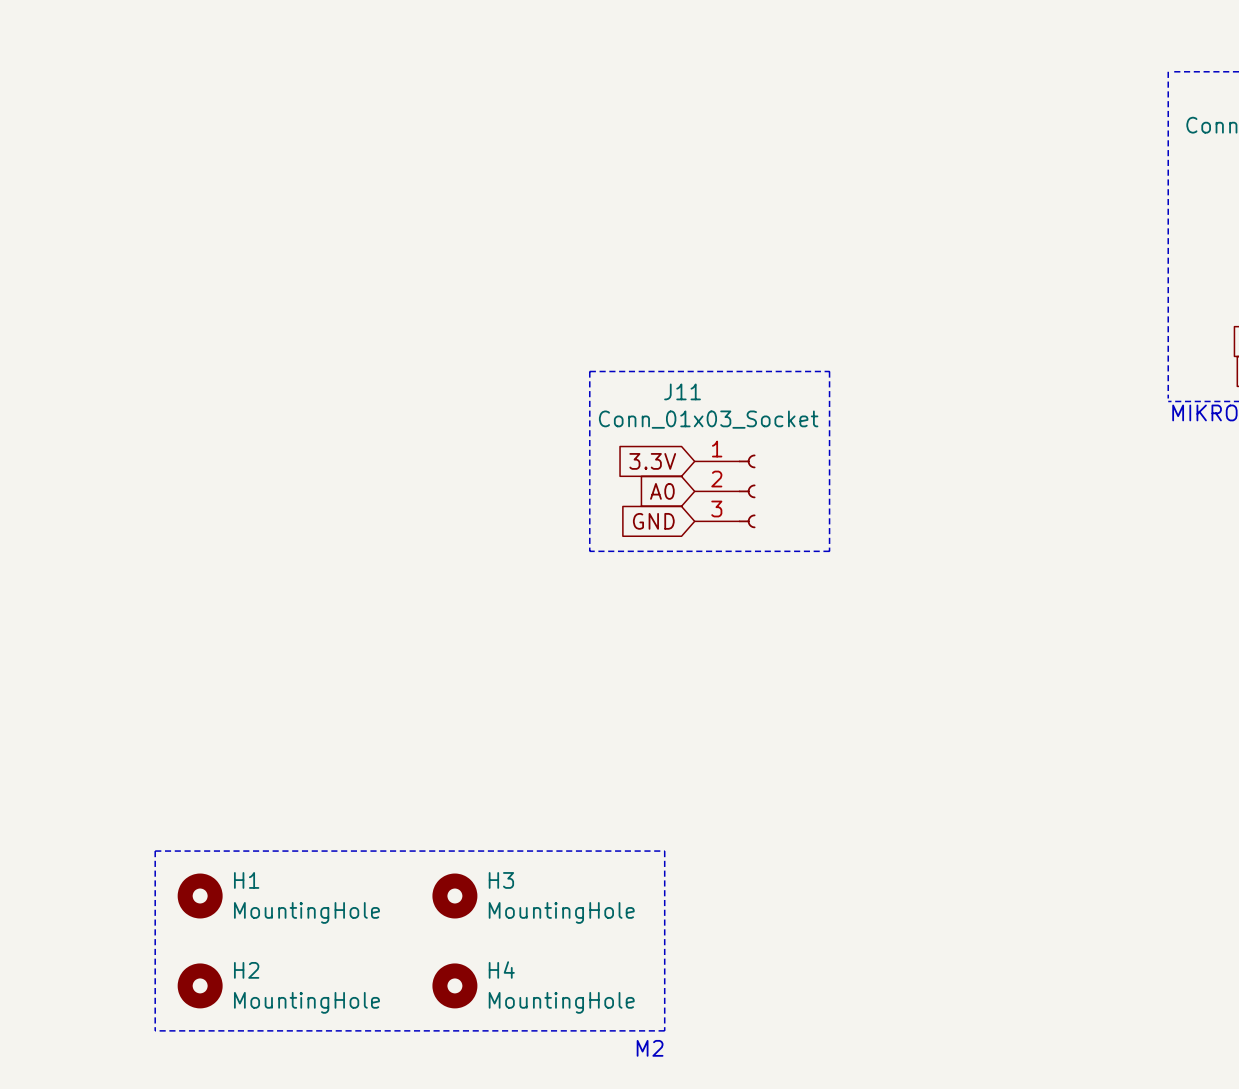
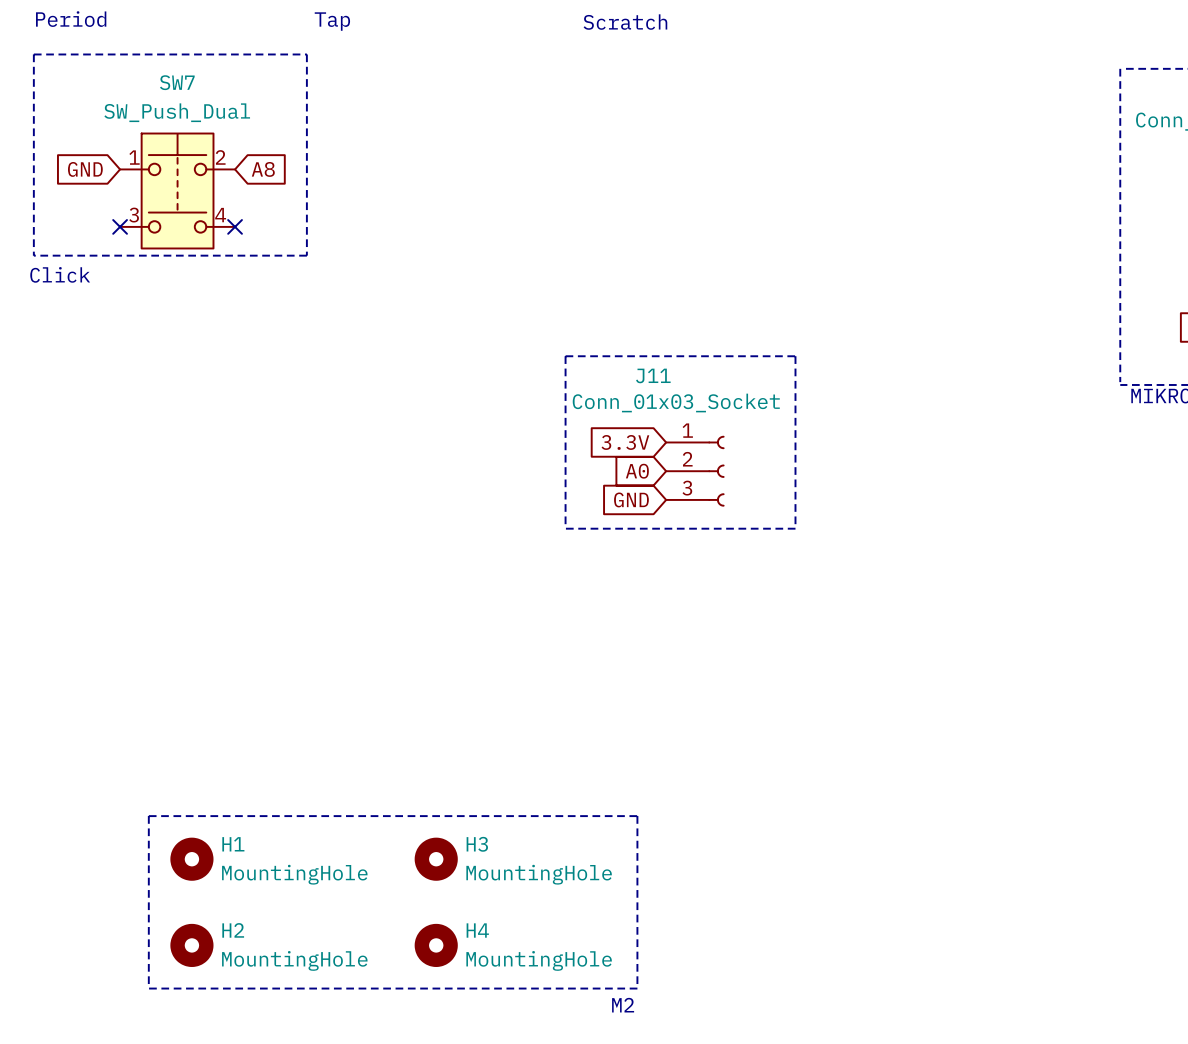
text: none -> Period (71, 19)
text: none -> Tap (332, 21)
text: none -> Scratch (625, 22)
line: none -> (33, 54) (33, 255) (306, 255) (306, 54) (33, 54)
global label: none -> GND (85, 169)
global label: none -> A8 (263, 169)
SW7: none -> SW_Push_Dual (177, 190)
no-connect mark: none -> (120, 226)
no-connect mark: none -> (235, 226)
text: none -> Click (60, 274)

